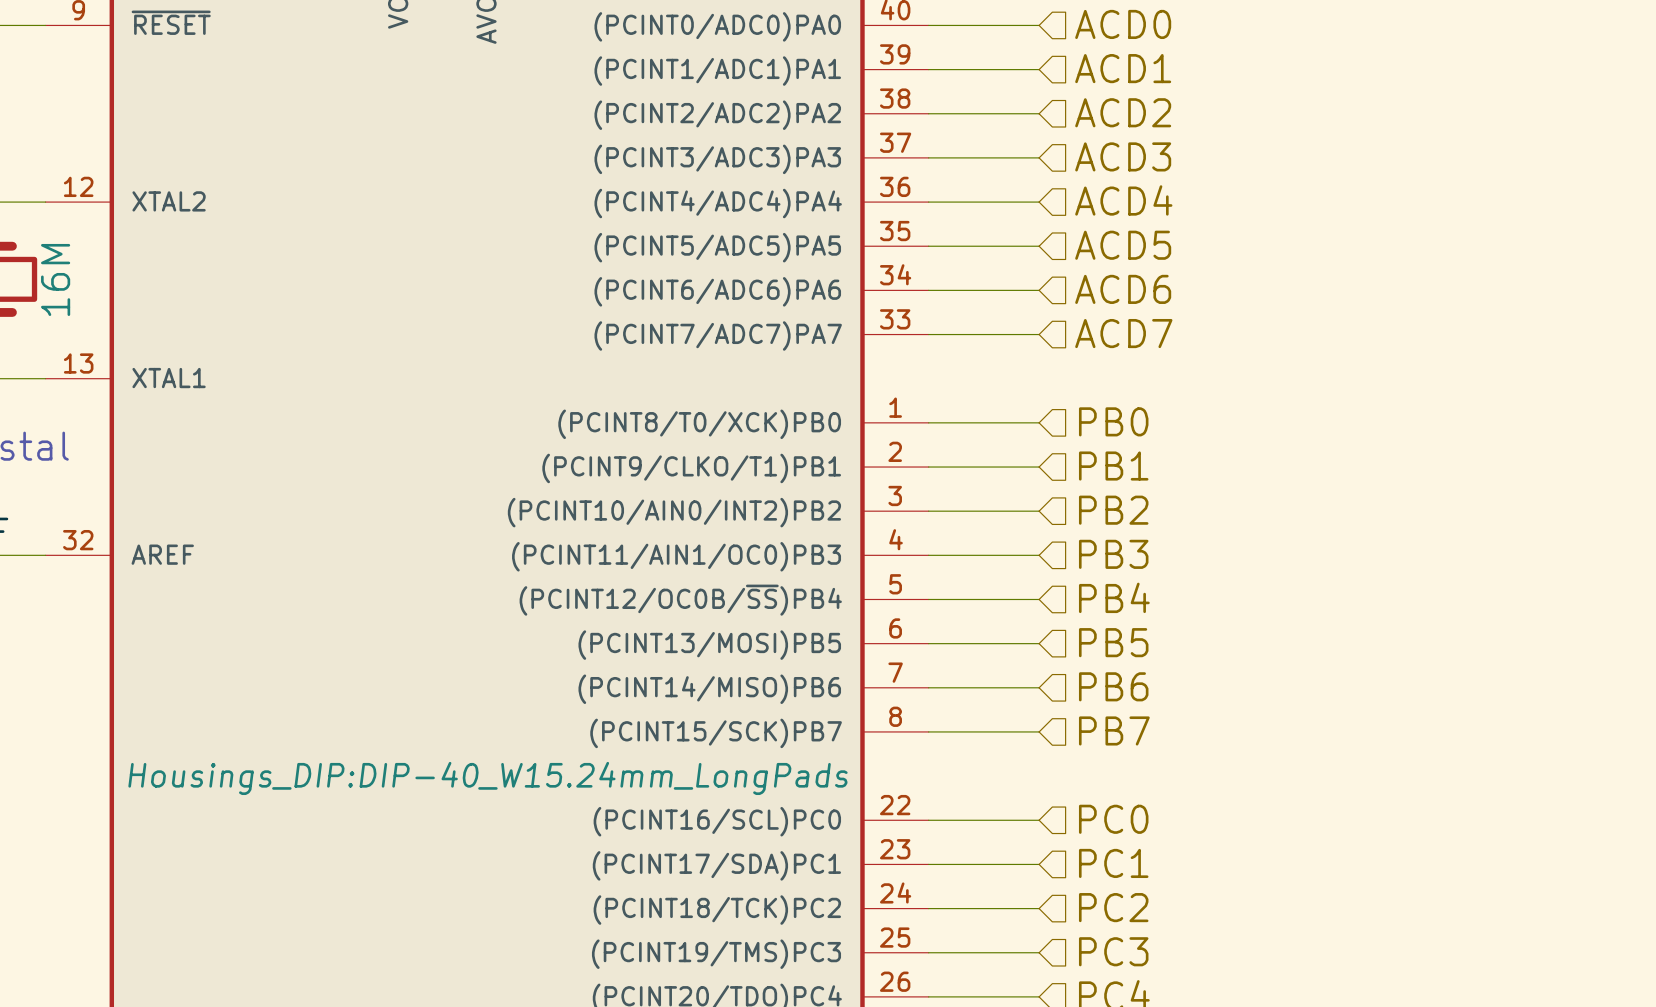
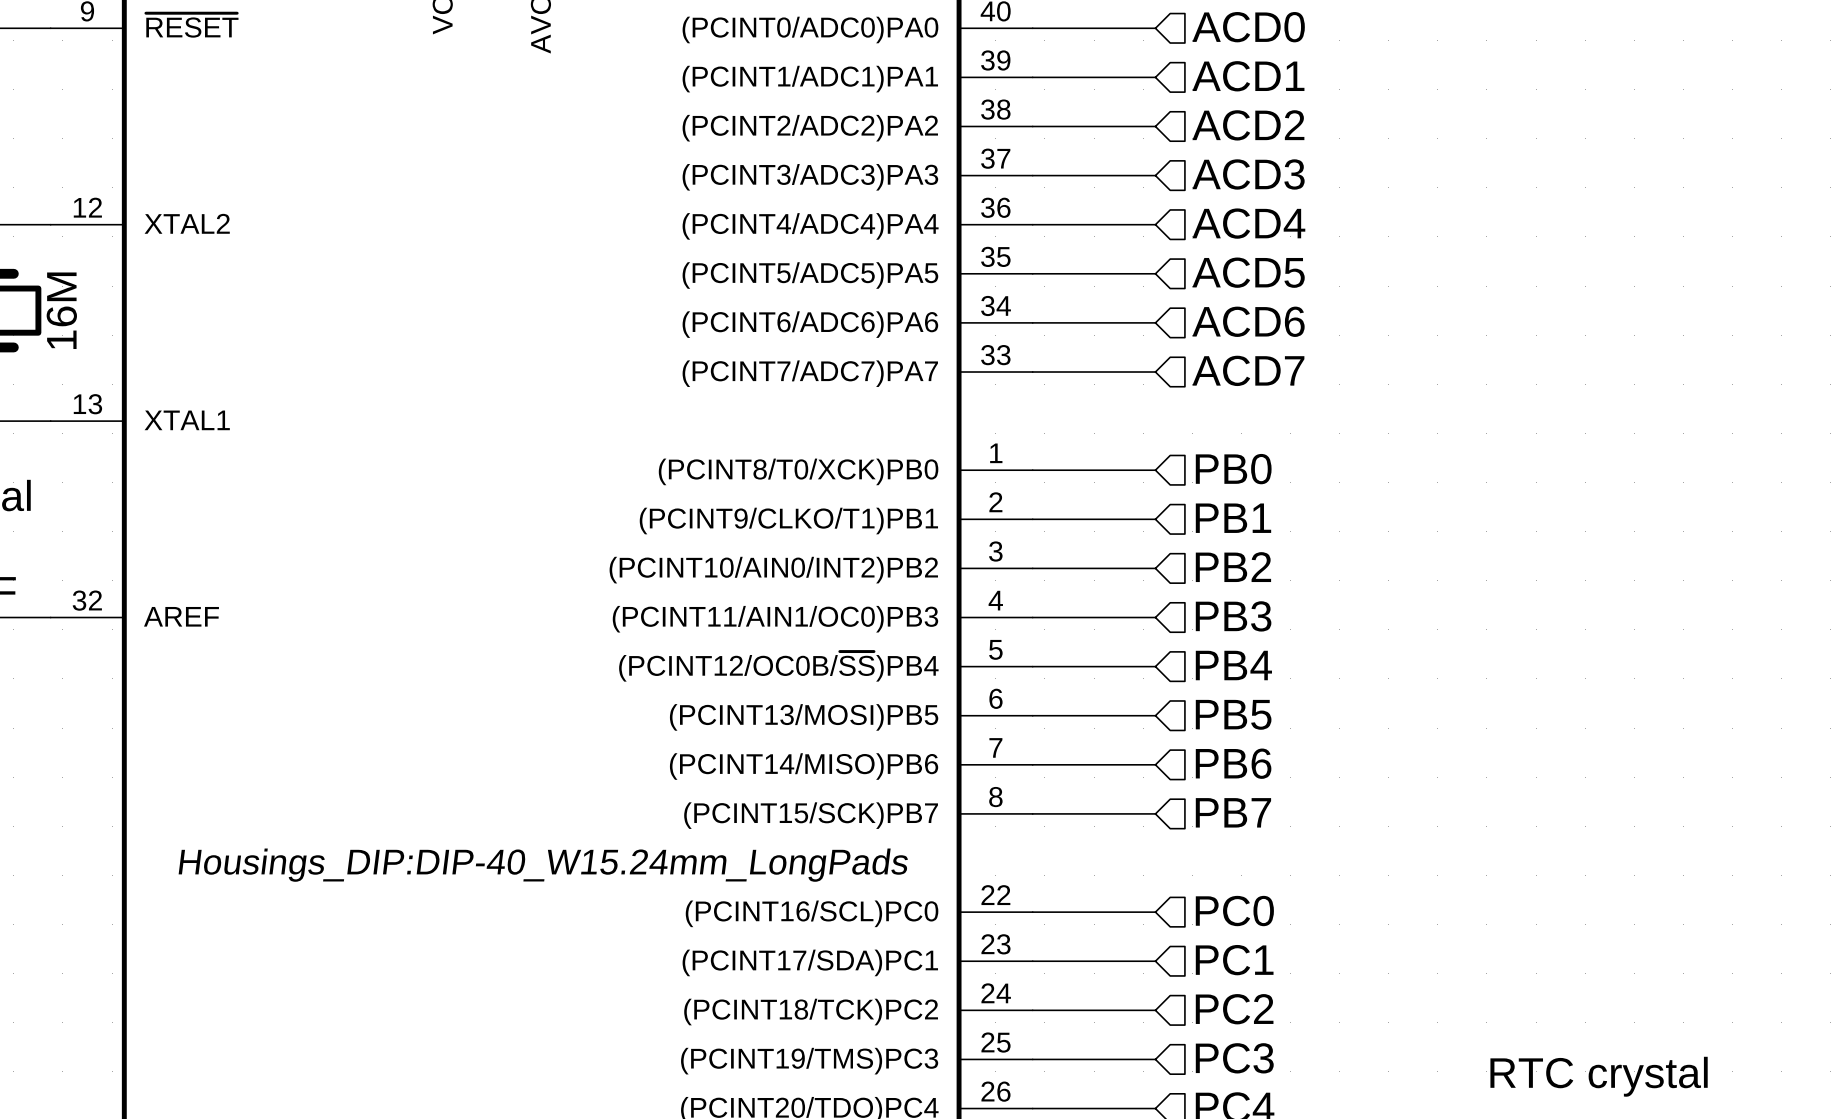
text: none -> RTC crystal (1599, 1076)

